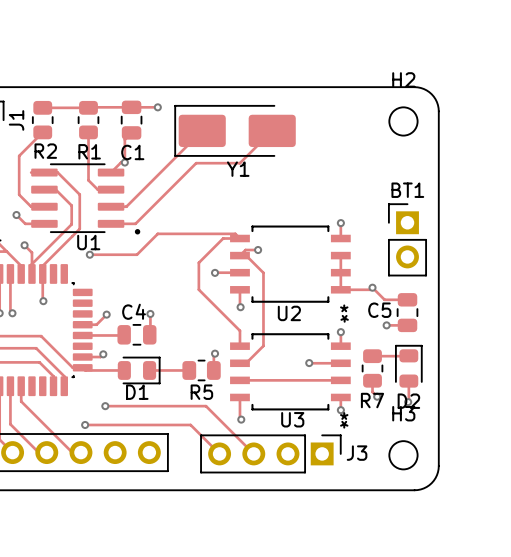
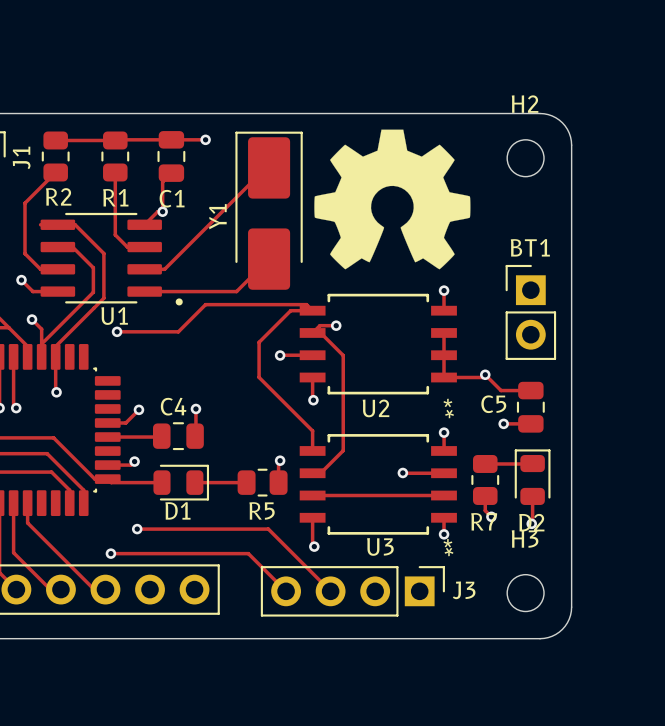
drawing: none -> [314, 129, 471, 270]
Y1 rotation: 0° (235, 130) -> 90° clockwise (269, 210)
track: (272, 130) (239, 163) (196, 163) (135, 223) -> (269, 259) (236, 291) (176, 291)

